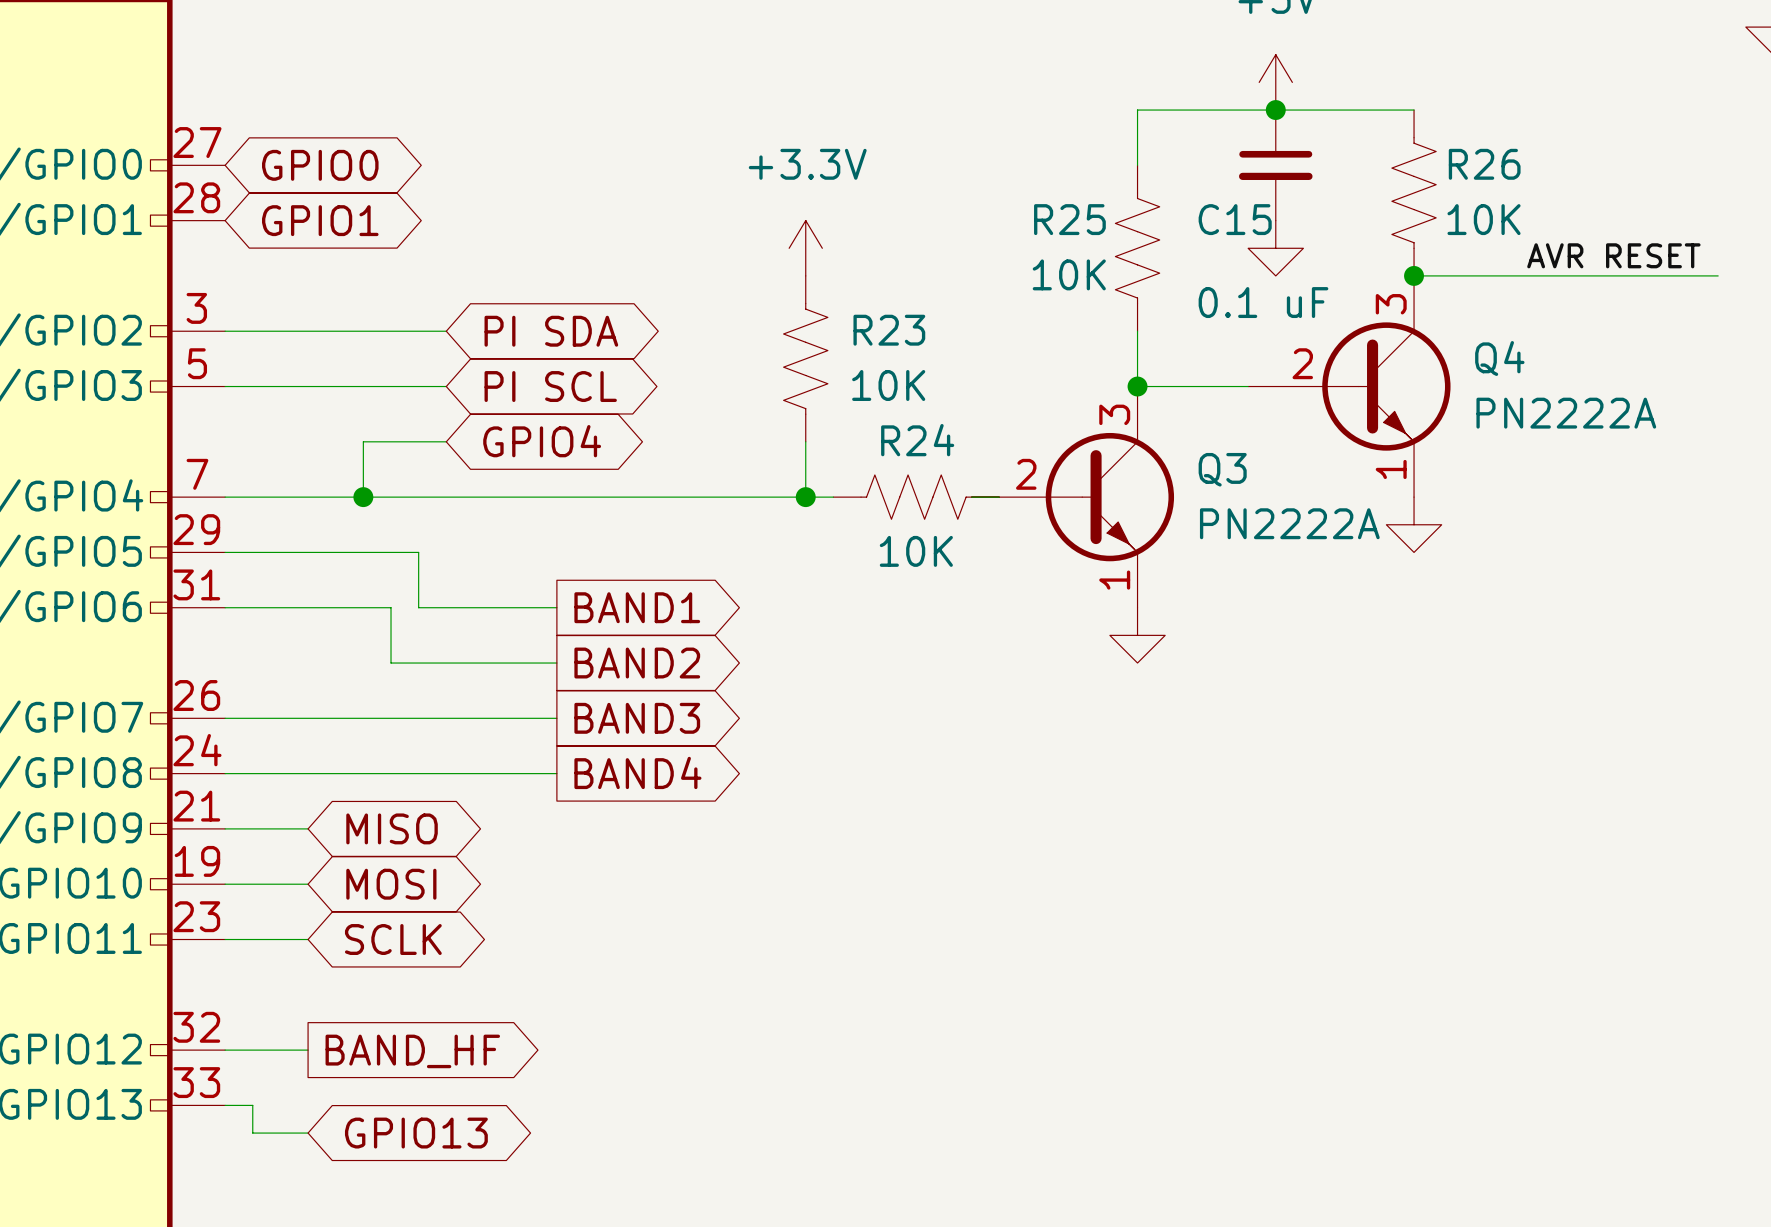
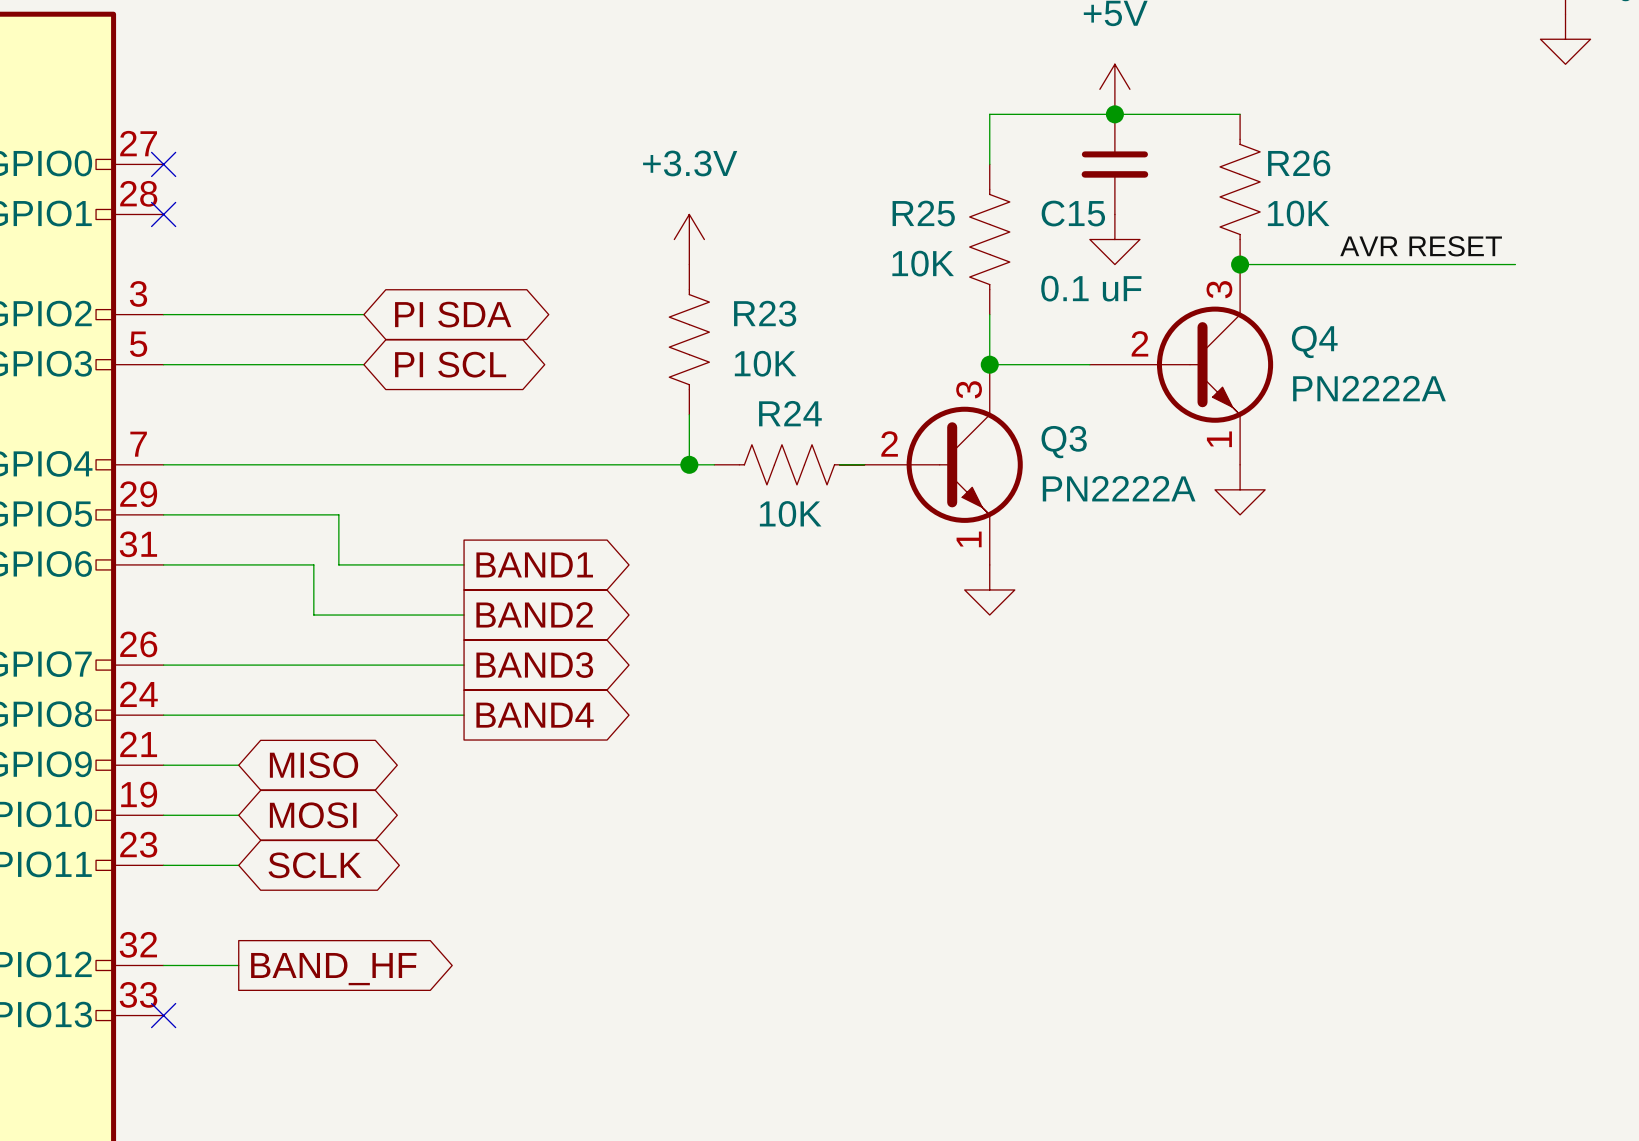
no-connect mark: none -> (163, 164)
global label: GPIO0 (320, 165) -> none
no-connect mark: none -> (163, 214)
global label: GPIO1 (320, 220) -> none
wire: (446, 441) (363, 441) (363, 497) -> none
global label: GPIO4 (542, 441) -> none
junction: (363, 497) -> none
wire: (225, 1105) (252, 1105) (252, 1133) (308, 1133) -> none
no-connect mark: none -> (163, 1015)
global label: GPIO13 (416, 1133) -> none

